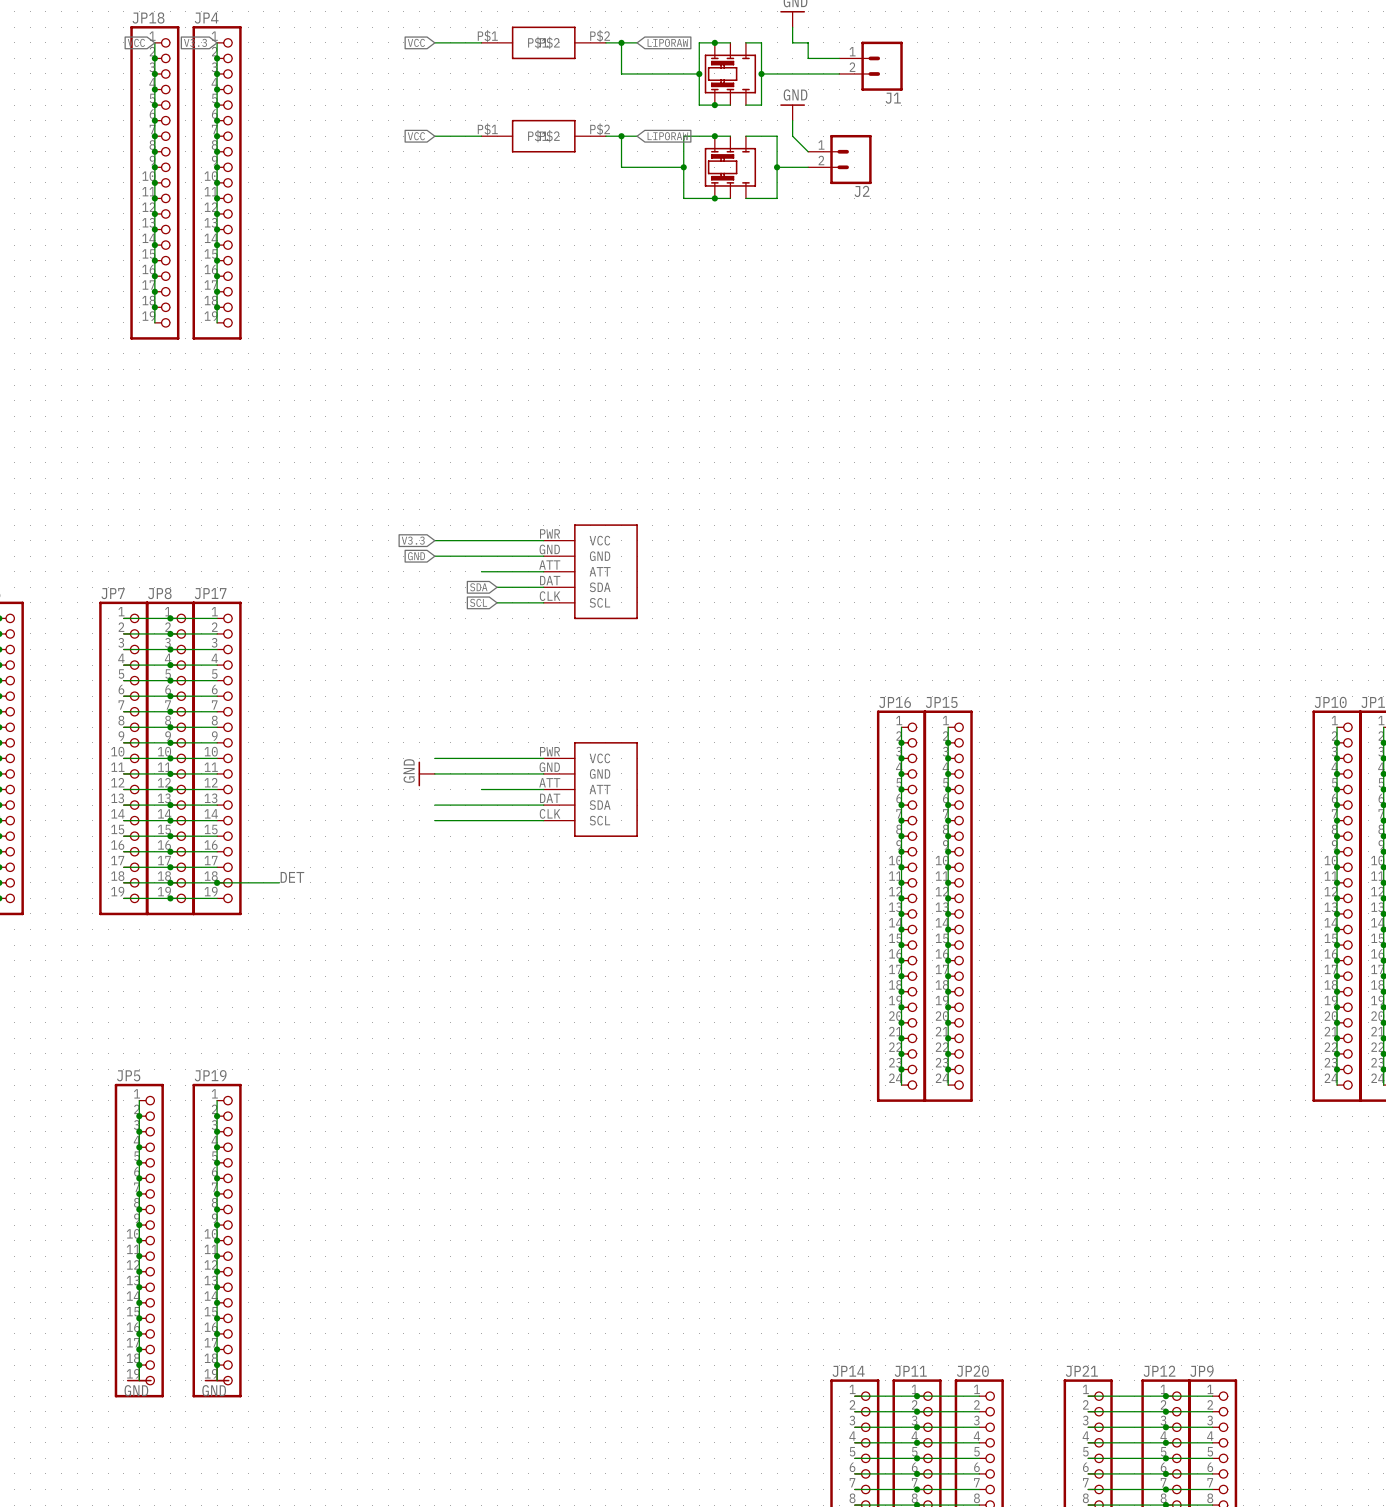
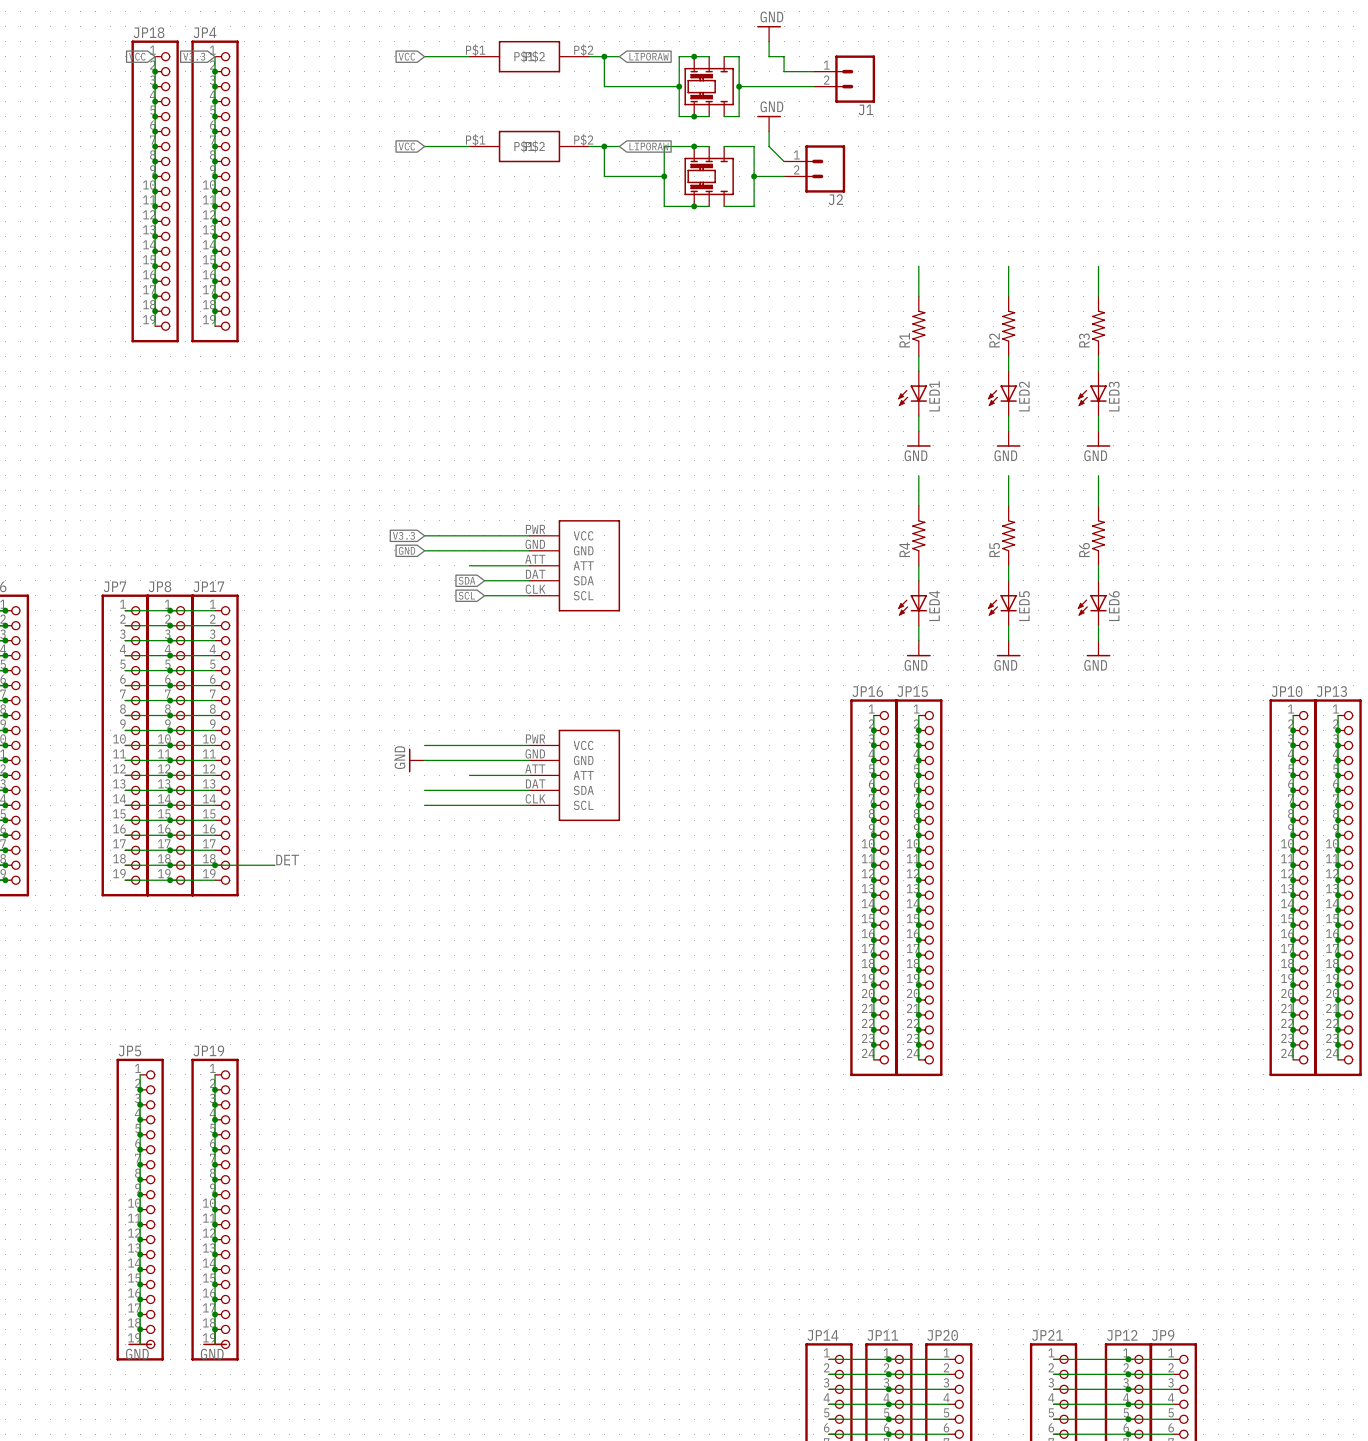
wire: none -> (918, 266) (918, 296)
wire: none -> (1008, 266) (1008, 296)
wire: none -> (1098, 266) (1098, 296)
R1: none -> (918, 326)
R2: none -> (1008, 326)
R3: none -> (1098, 326)
wire: none -> (918, 356) (918, 371)
wire: none -> (1008, 356) (1008, 371)
wire: none -> (1098, 356) (1098, 371)
LED1: none -> (912, 393)
LED2: none -> (1002, 393)
LED3: none -> (1092, 393)
wire: none -> (918, 416) (918, 431)
wire: none -> (1008, 416) (1008, 431)
wire: none -> (1098, 416) (1098, 431)
power symbol: none -> GND (918, 438)
power symbol: none -> GND (1008, 438)
power symbol: none -> GND (1098, 438)
wire: none -> (918, 475) (918, 505)
wire: none -> (1008, 475) (1008, 505)
wire: none -> (1098, 475) (1098, 505)
R4: none -> (918, 535)
R5: none -> (1008, 535)
R6: none -> (1098, 535)
wire: none -> (918, 565) (918, 580)
wire: none -> (1008, 565) (1008, 580)
wire: none -> (1098, 565) (1098, 580)
LED4: none -> (912, 603)
LED5: none -> (1002, 603)
LED6: none -> (1092, 603)
wire: none -> (918, 625) (918, 640)
wire: none -> (1008, 625) (1008, 640)
wire: none -> (1098, 625) (1098, 640)
power symbol: none -> GND (918, 648)
power symbol: none -> GND (1008, 648)
power symbol: none -> GND (1098, 648)

